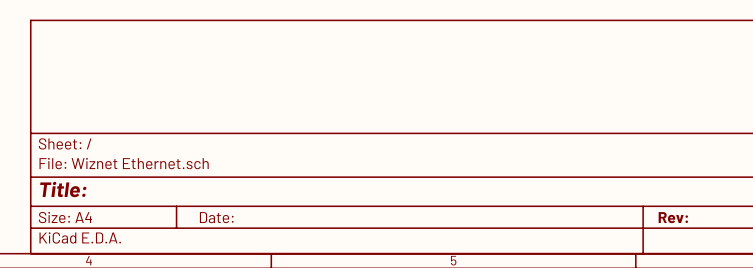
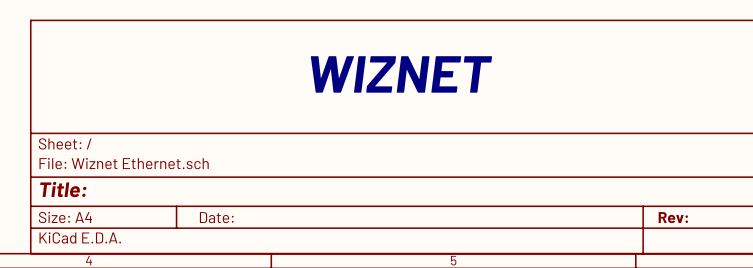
text: none -> WIZNET (401, 74)

